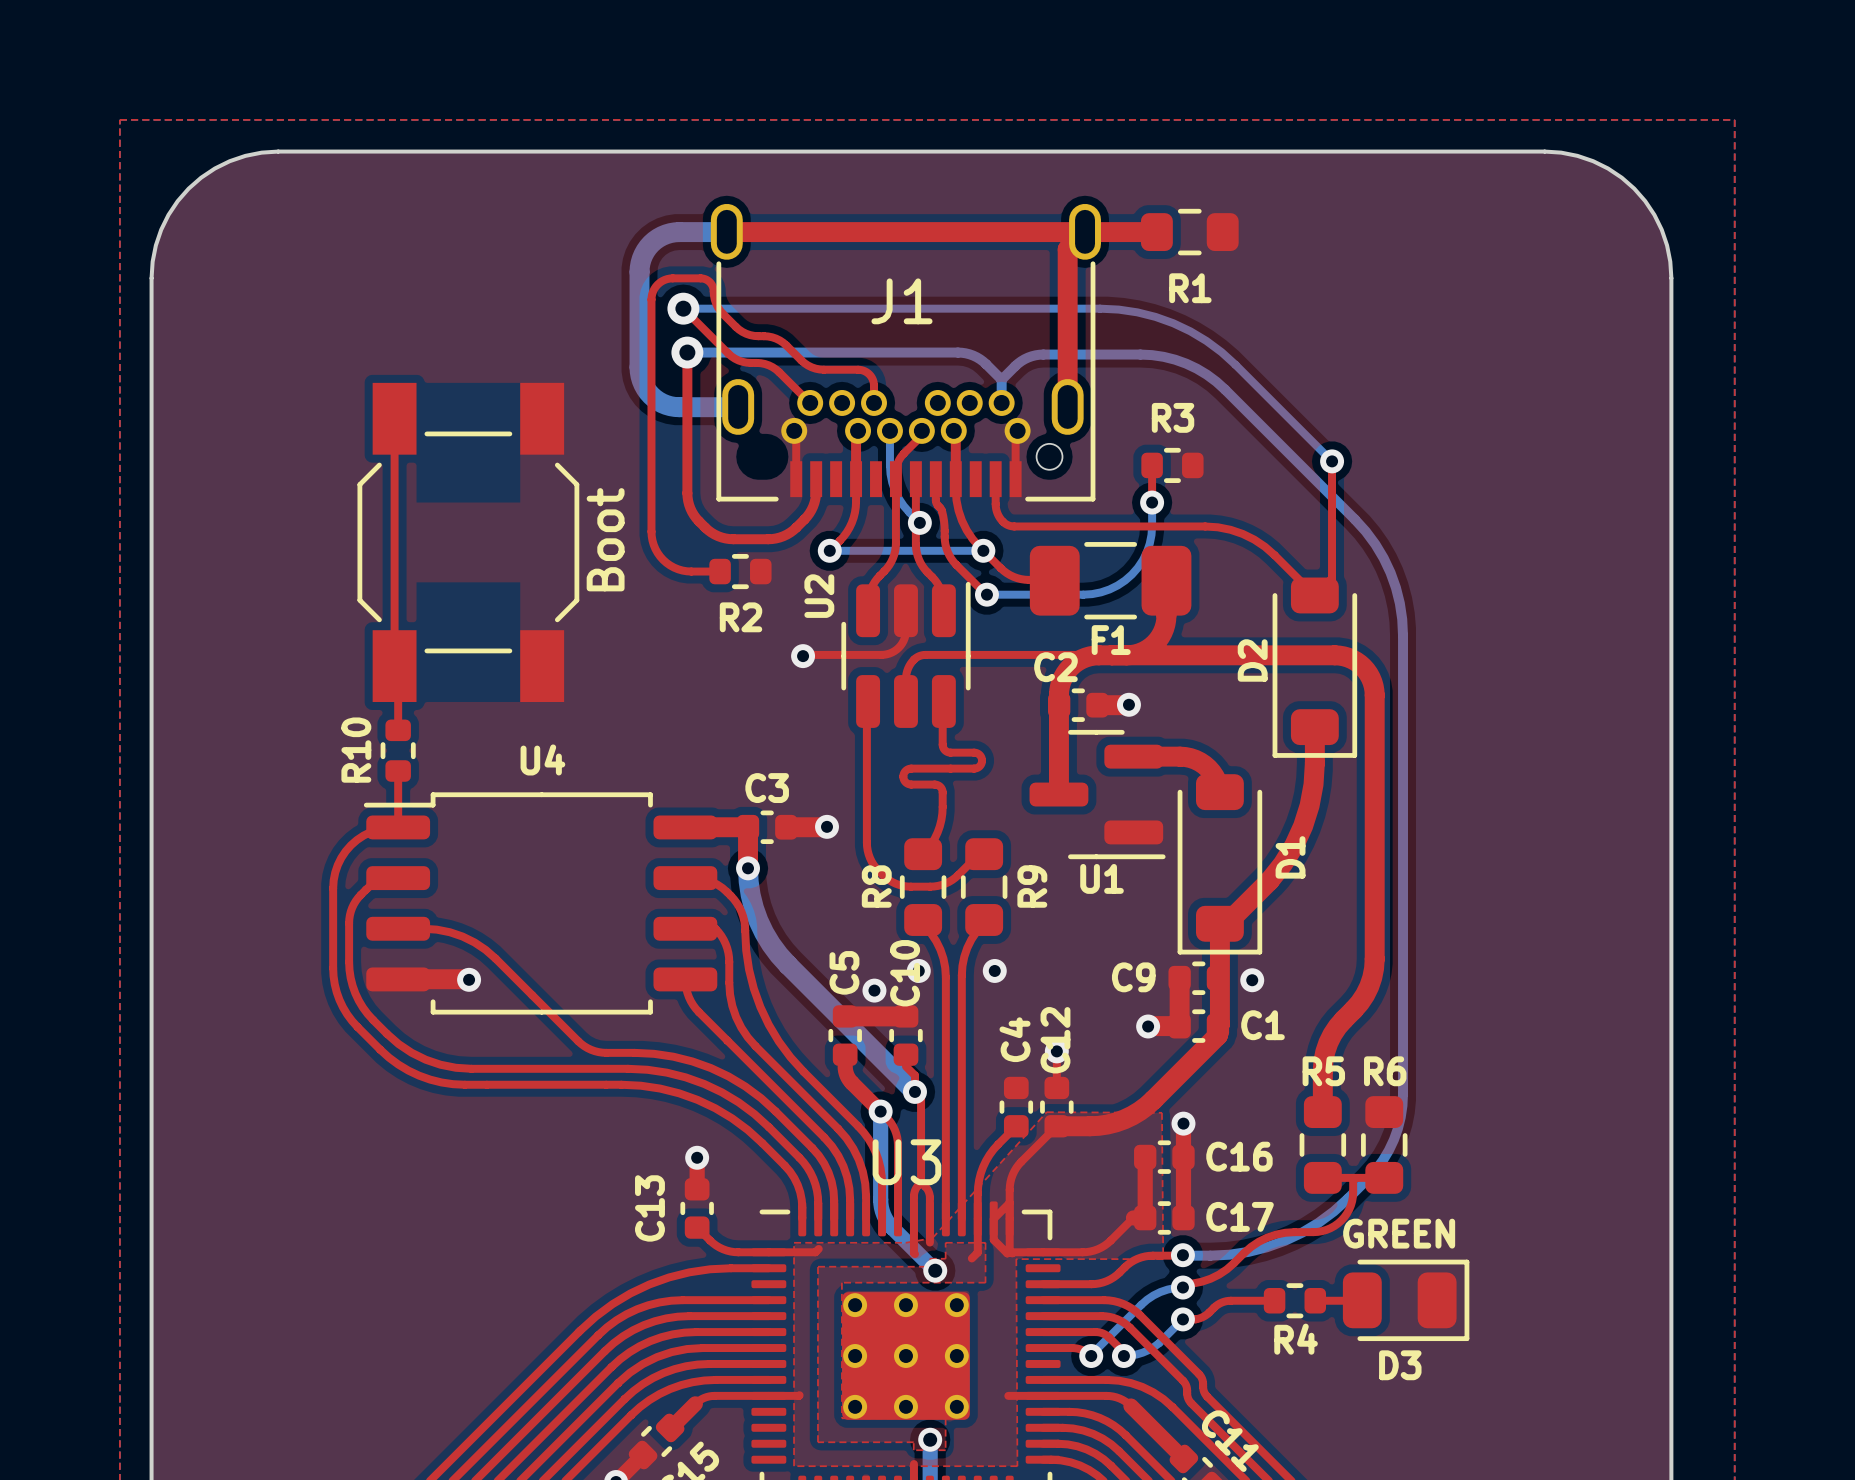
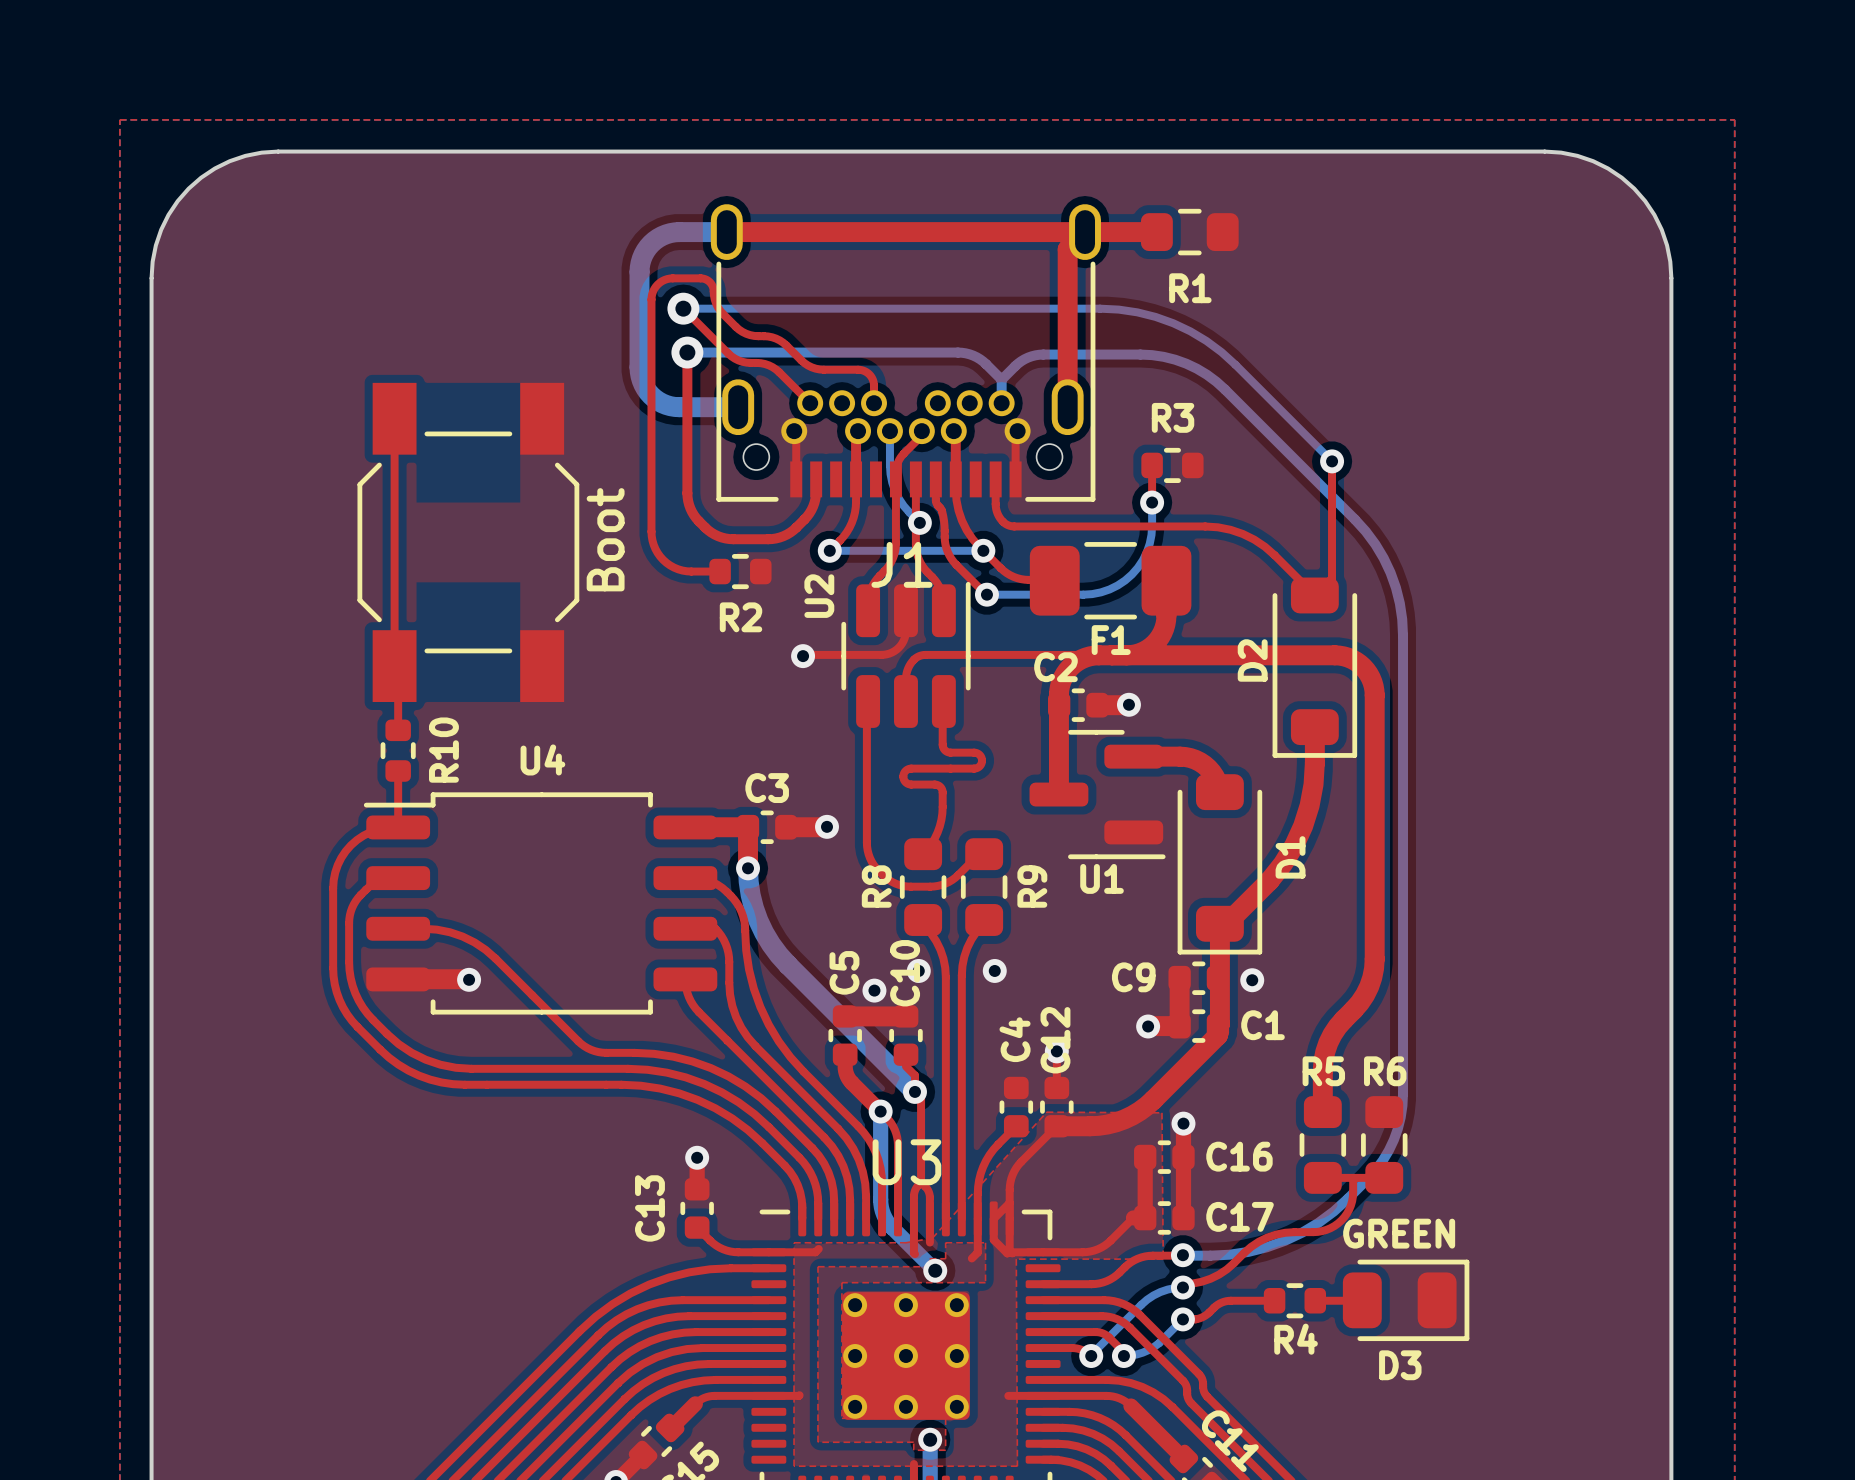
J1 footprint: [710, 203, 1101, 502] -> [710, 204, 1101, 502]
J1 name position: J1 (901, 301) -> J1 (901, 564)
R10 name position: R10 (356, 750) -> R10 (443, 750)

